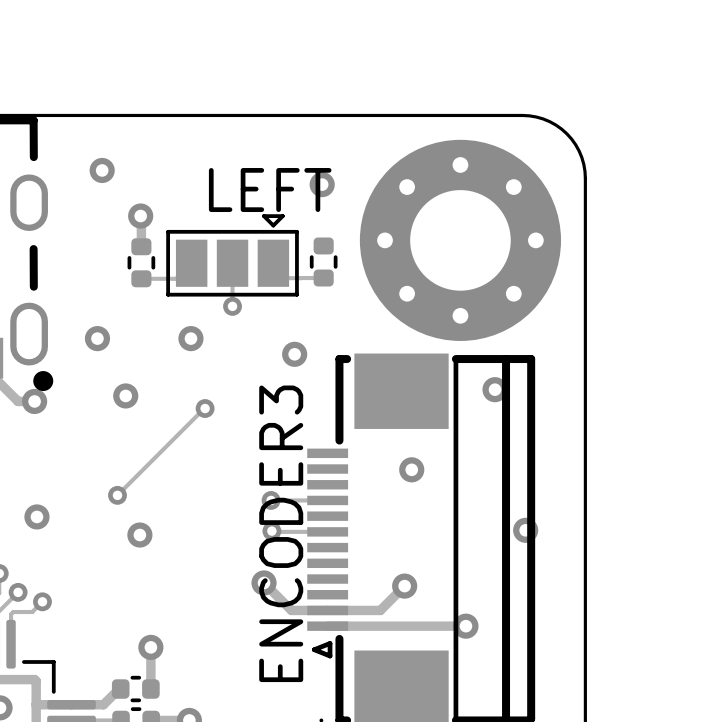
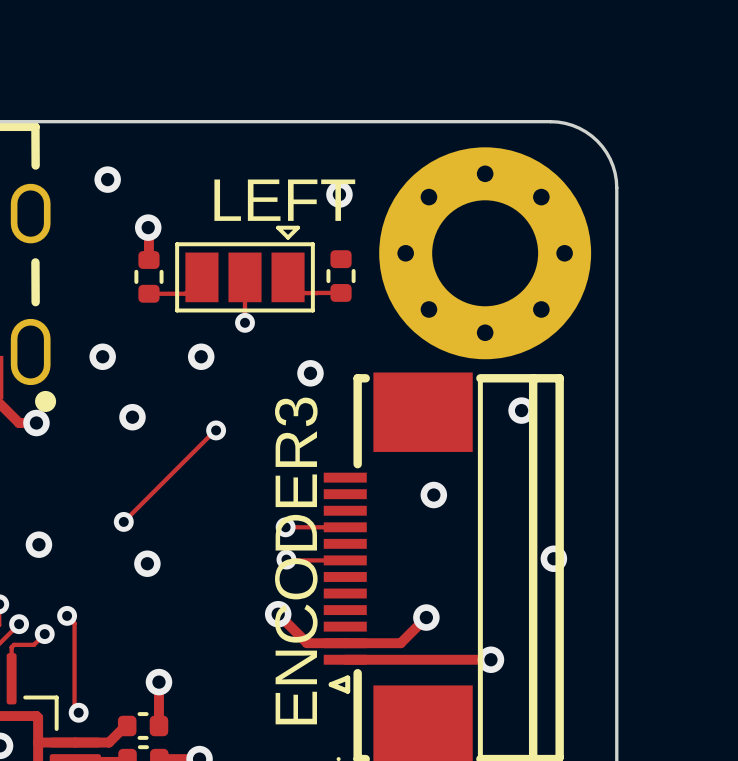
track: none -> (67, 615) (74, 623) (74, 708) (78, 712)
via: none -> (67, 615)
via: none -> (78, 712)

